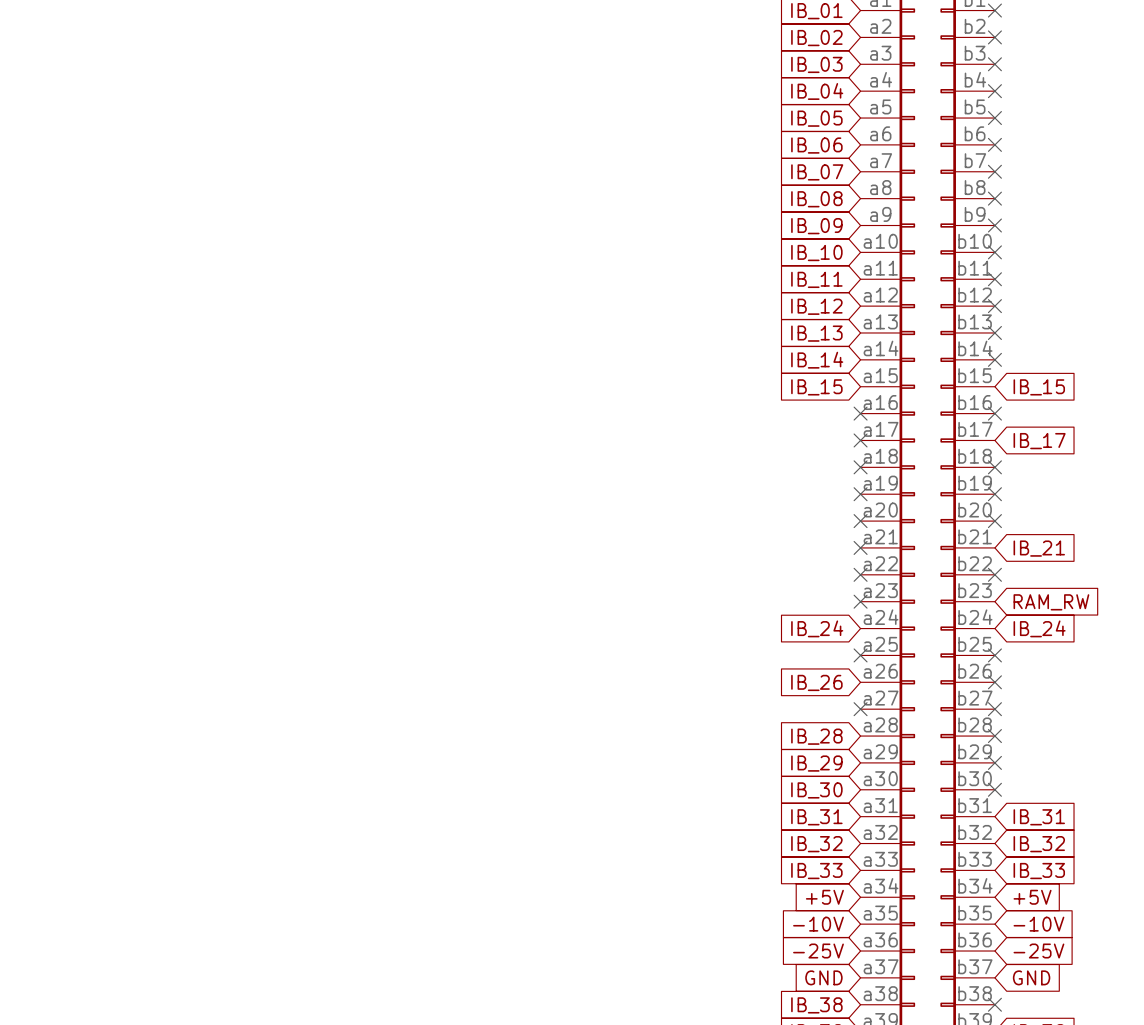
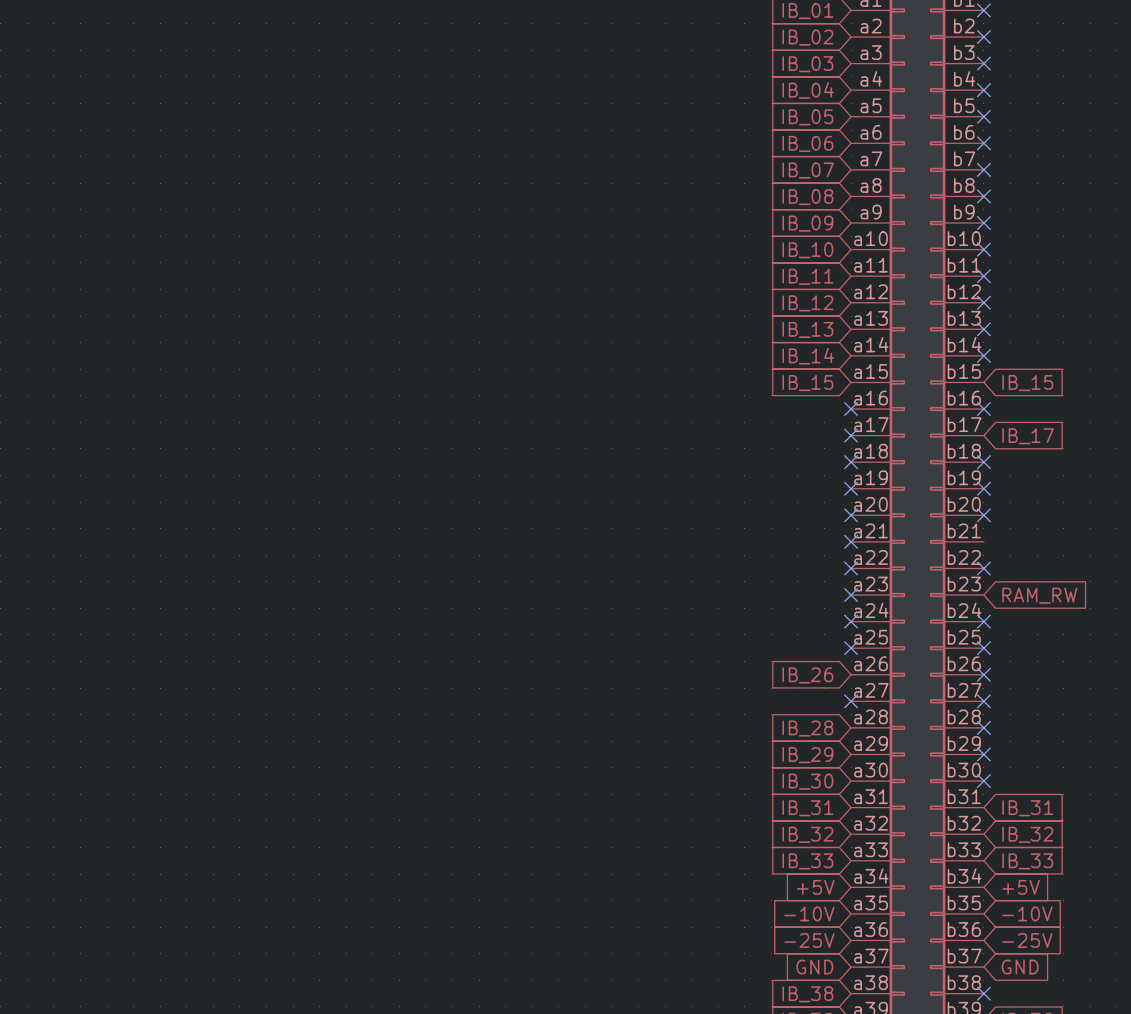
global label: IB_21 (1039, 548) -> none
global label: IB_24 (817, 628) -> none
no-connect mark: none -> (851, 621)
no-connect mark: none -> (983, 621)
global label: IB_24 (1039, 628) -> none

